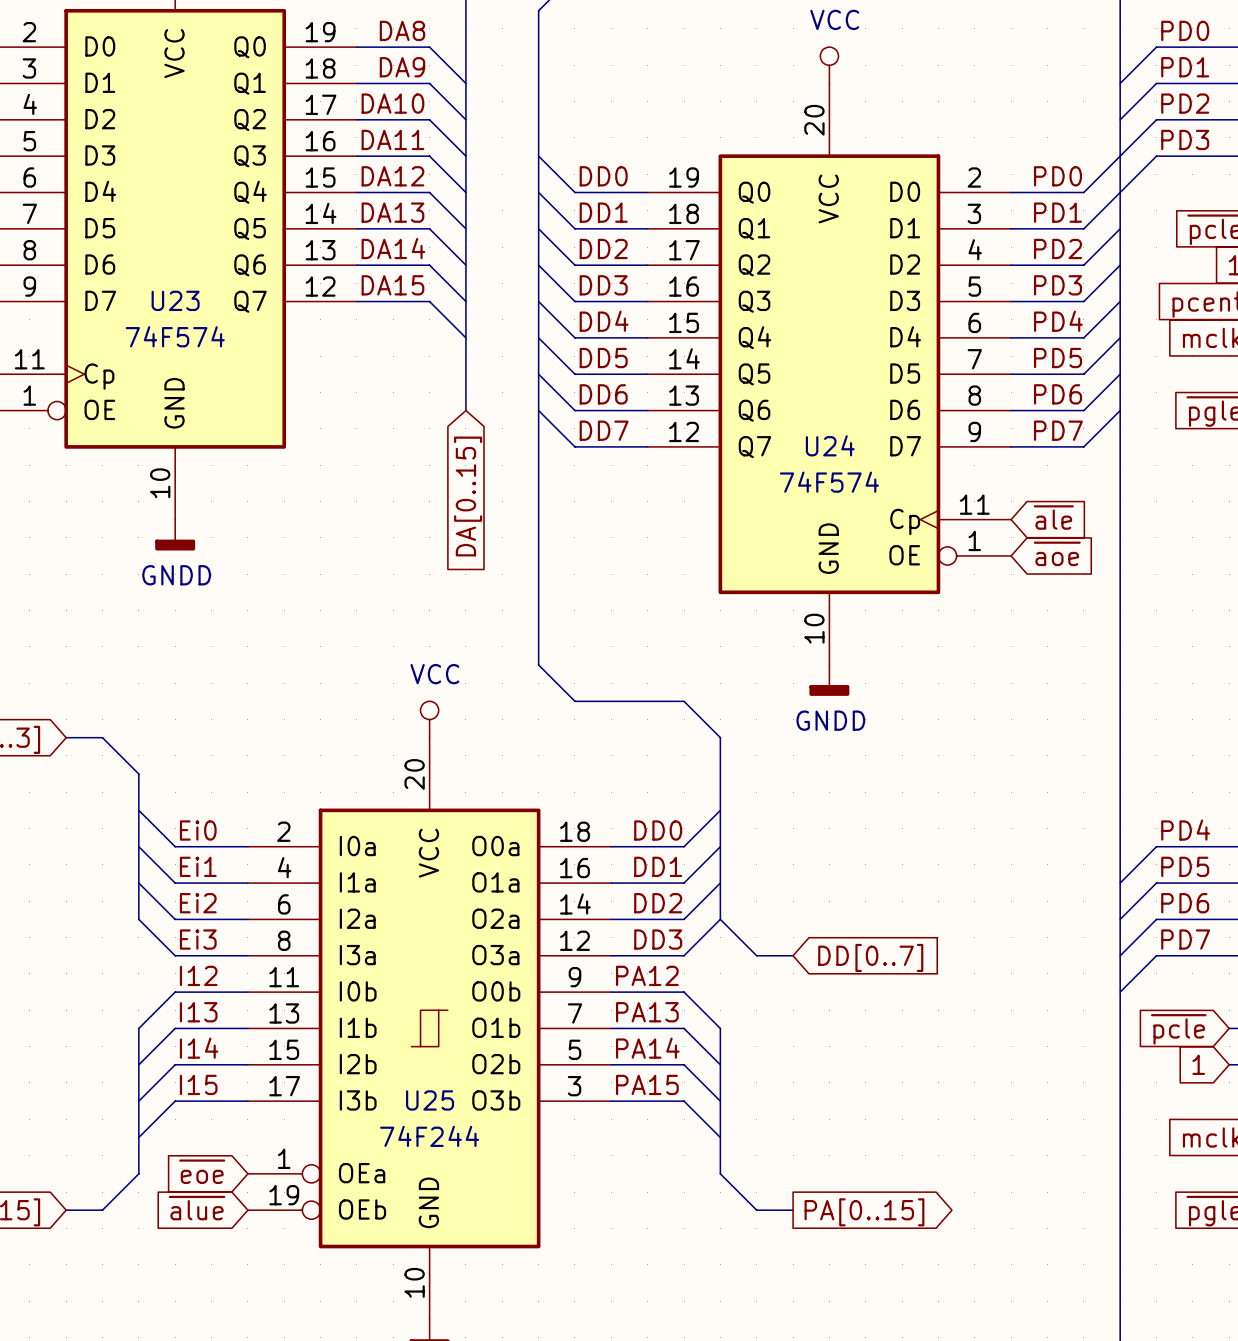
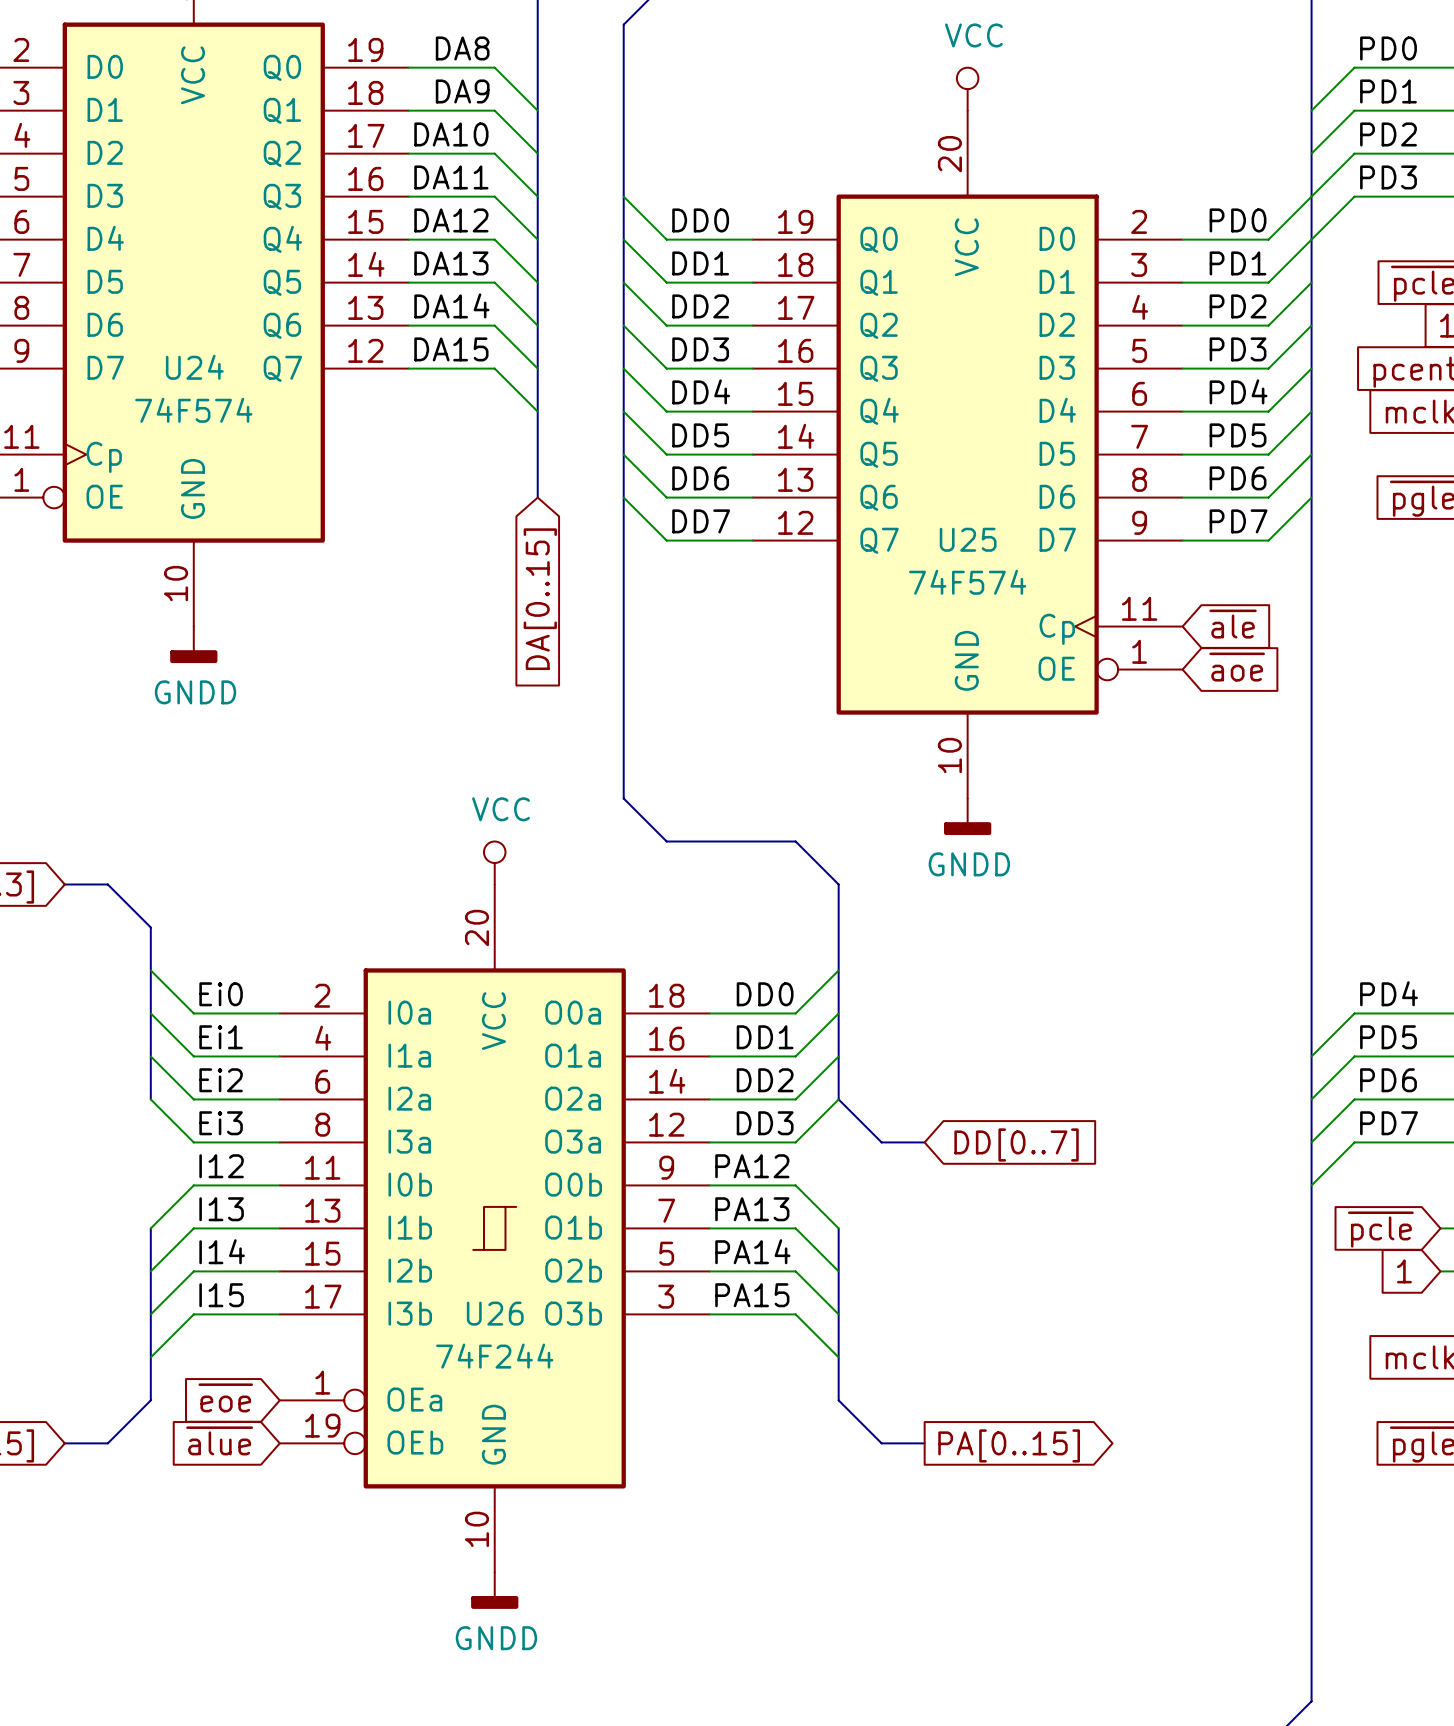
U23 name: U23 (175, 300) -> U24 (194, 367)
U24 name: U24 (830, 445) -> U25 (968, 539)
U25 name: U25 (430, 1100) -> U26 (495, 1313)

